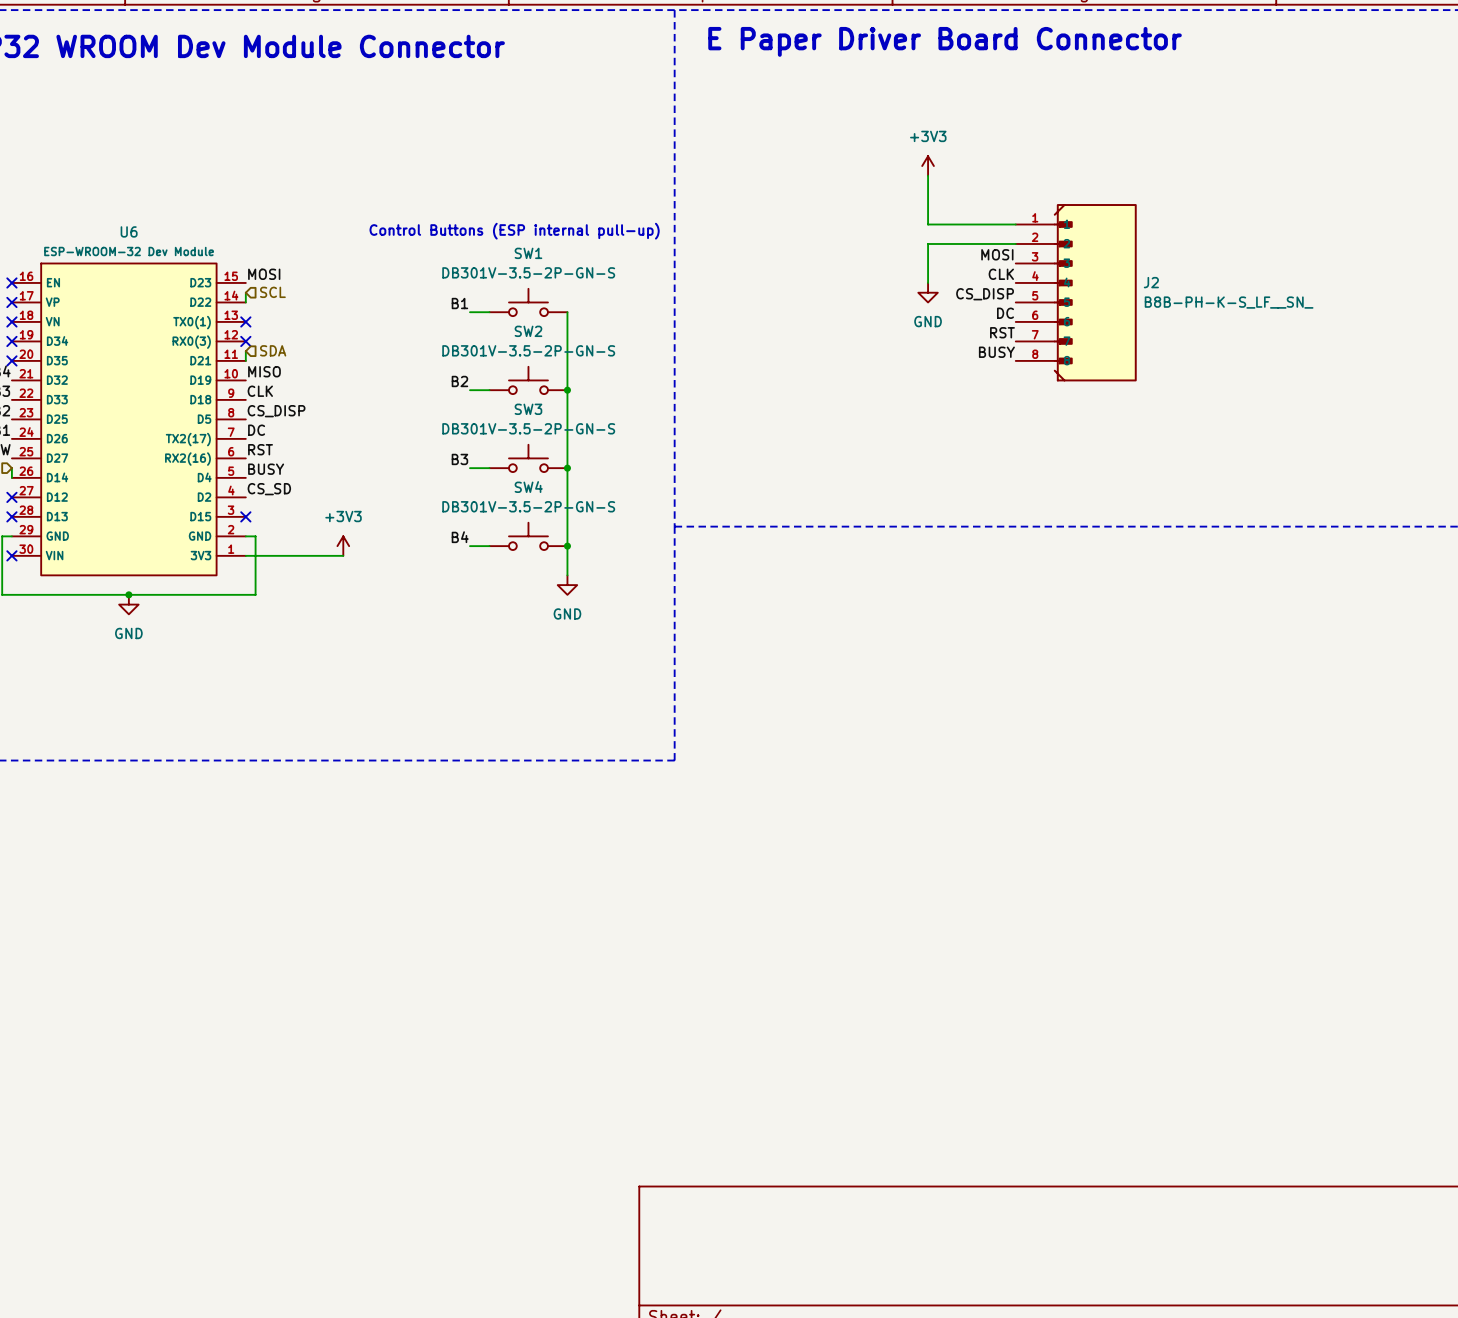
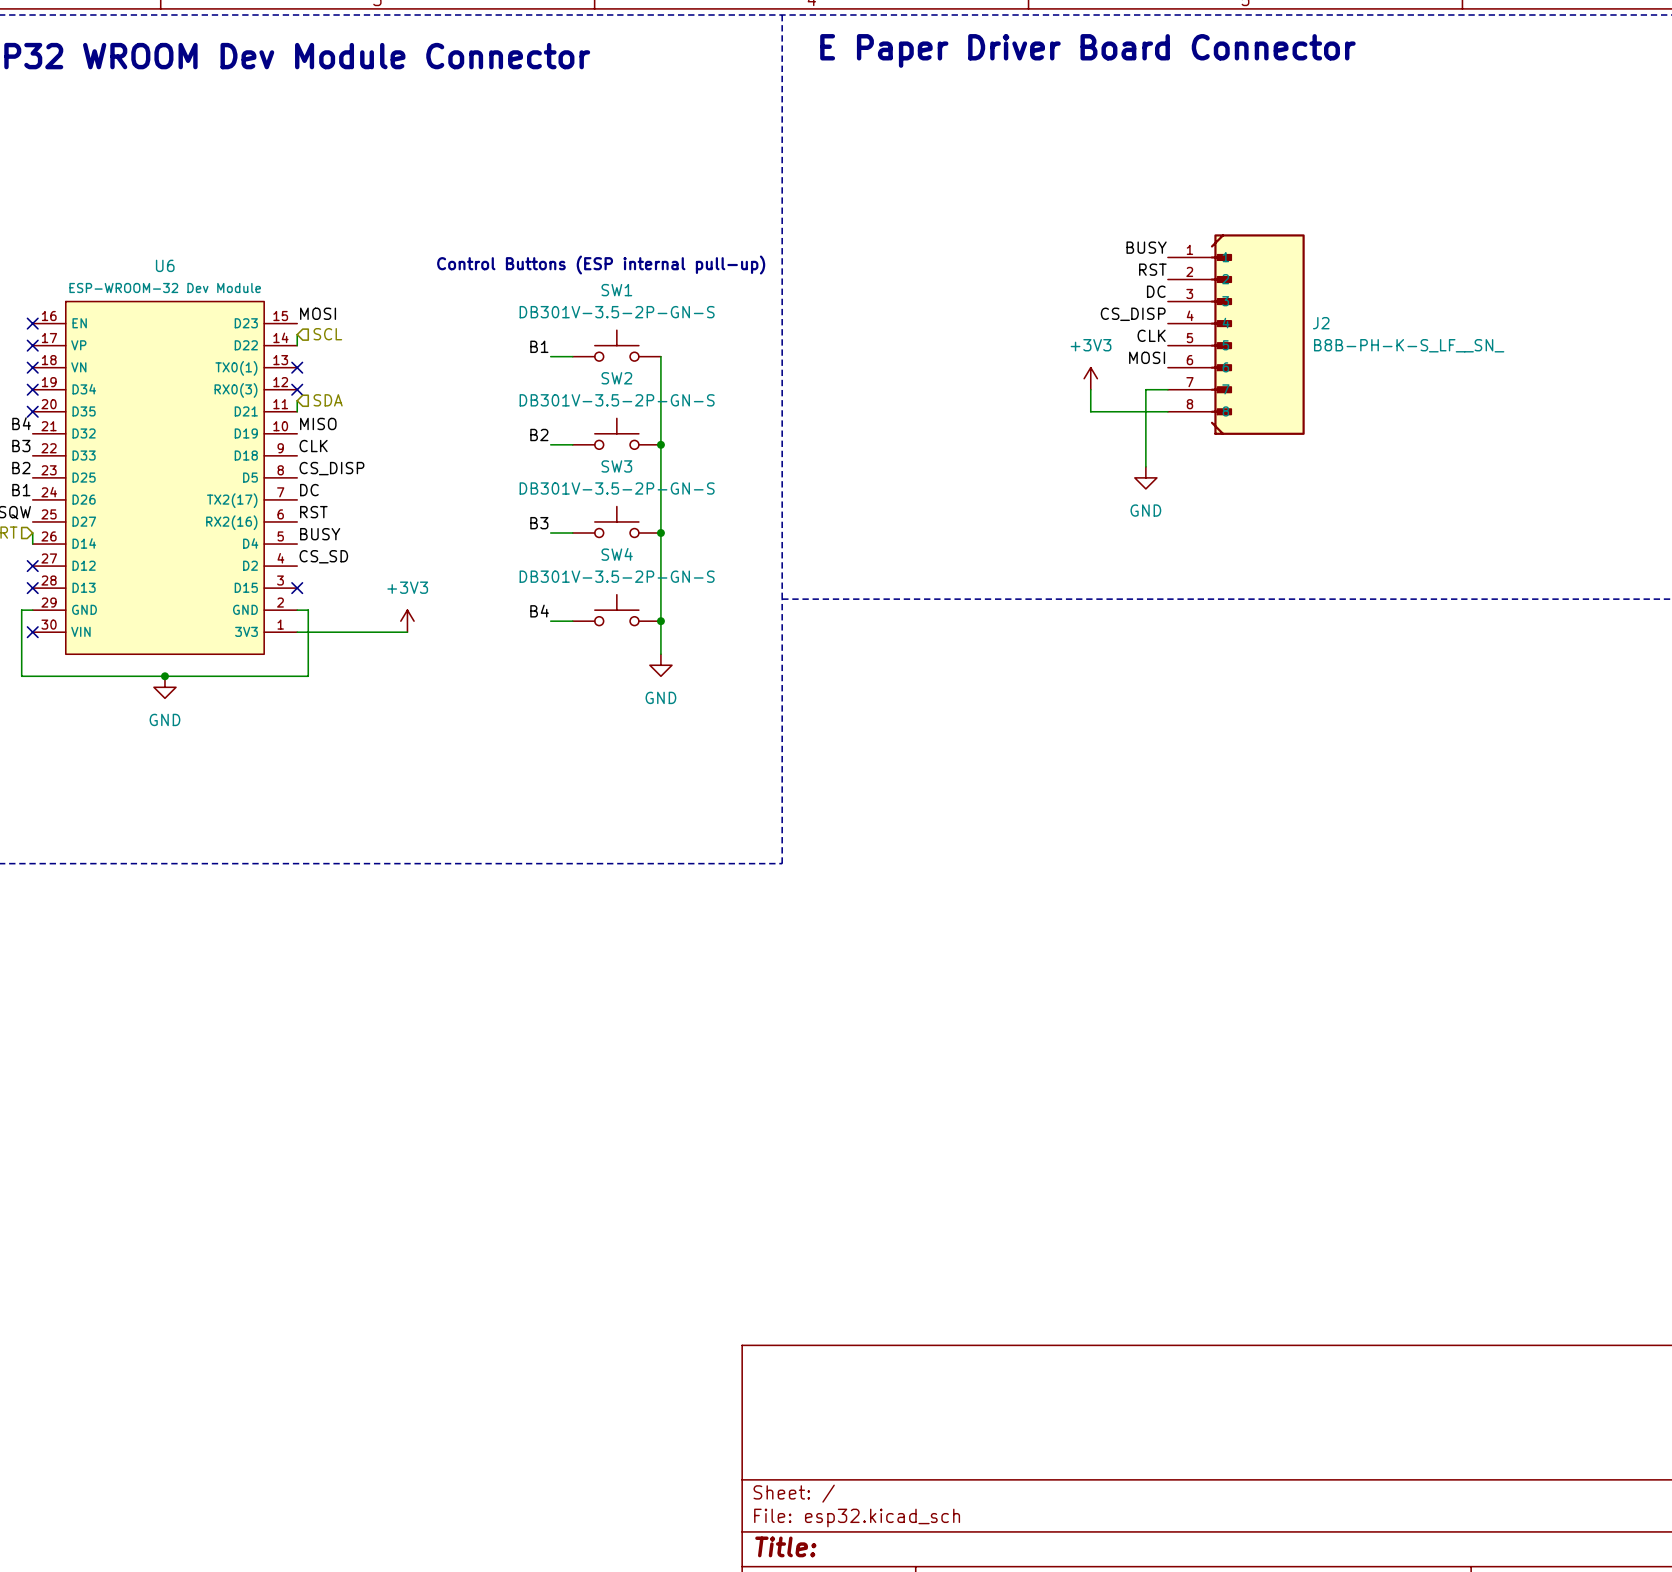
power symbol position: +3V3 (928, 166) -> +3V3 (1090, 378)
wire: (928, 175) (928, 224) (1015, 224) -> none
wire: (1015, 243) (928, 243) (928, 282) -> none
label: MOSI (997, 254) -> DC (1156, 291)
label: CLK (1001, 274) -> CS_DISP (1133, 314)
power symbol position: GND (928, 292) -> GND (1145, 477)
label: CS_DISP (985, 294) -> CLK (1151, 335)
label: DC (1005, 313) -> MOSI (1147, 357)
label position: RST (1002, 332) -> RST (1152, 269)
wire: none -> (1090, 389) (1090, 411) (1167, 411)
wire: none -> (1167, 389) (1145, 389) (1145, 466)
label position: BUSY (996, 352) -> BUSY (1146, 247)

